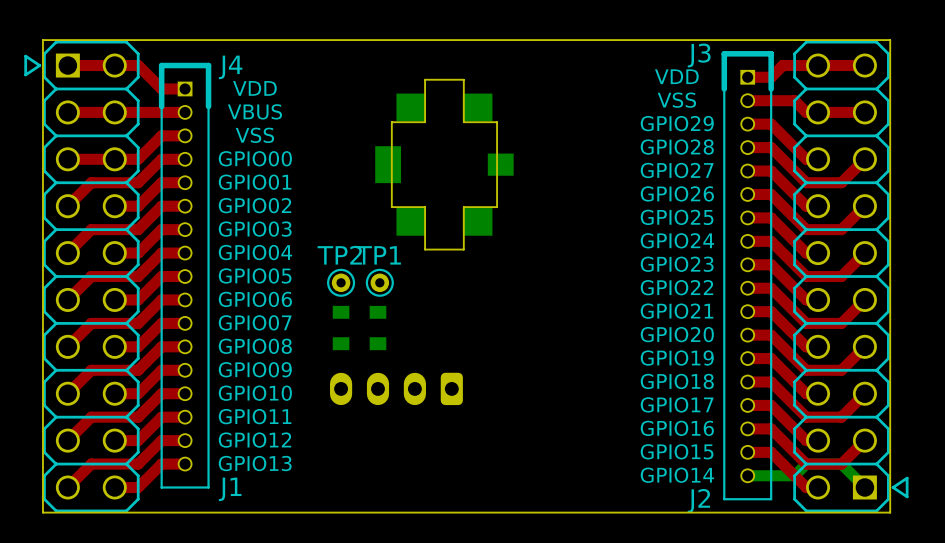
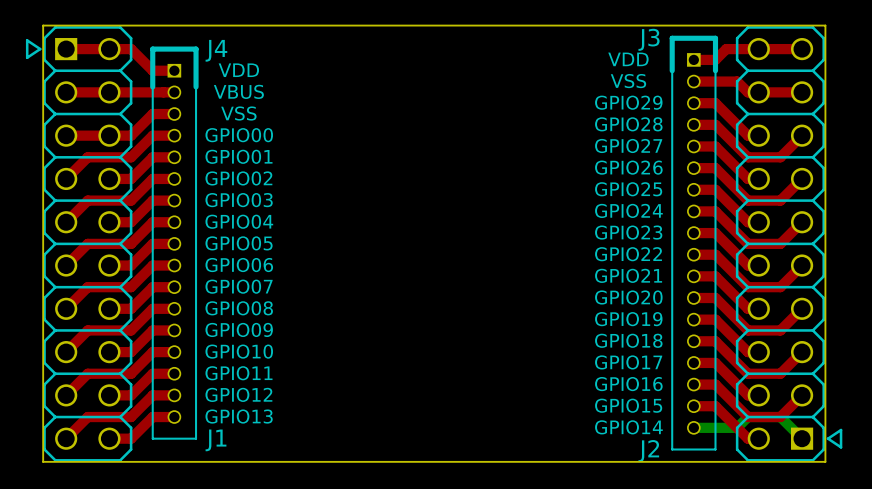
board edge: (425, 79) (425, 122) (391, 122) (391, 207) (425, 207) (425, 249) (463, 249) (463, 207) (497, 207) (497, 122) (463, 122) (463, 79) (425, 79) -> none
part: (444, 164) -> none
TP2: (341, 282) -> none
TP1: (379, 282) -> none
part: (341, 328) -> none
part: (377, 328) -> none
part: (396, 388) -> none

